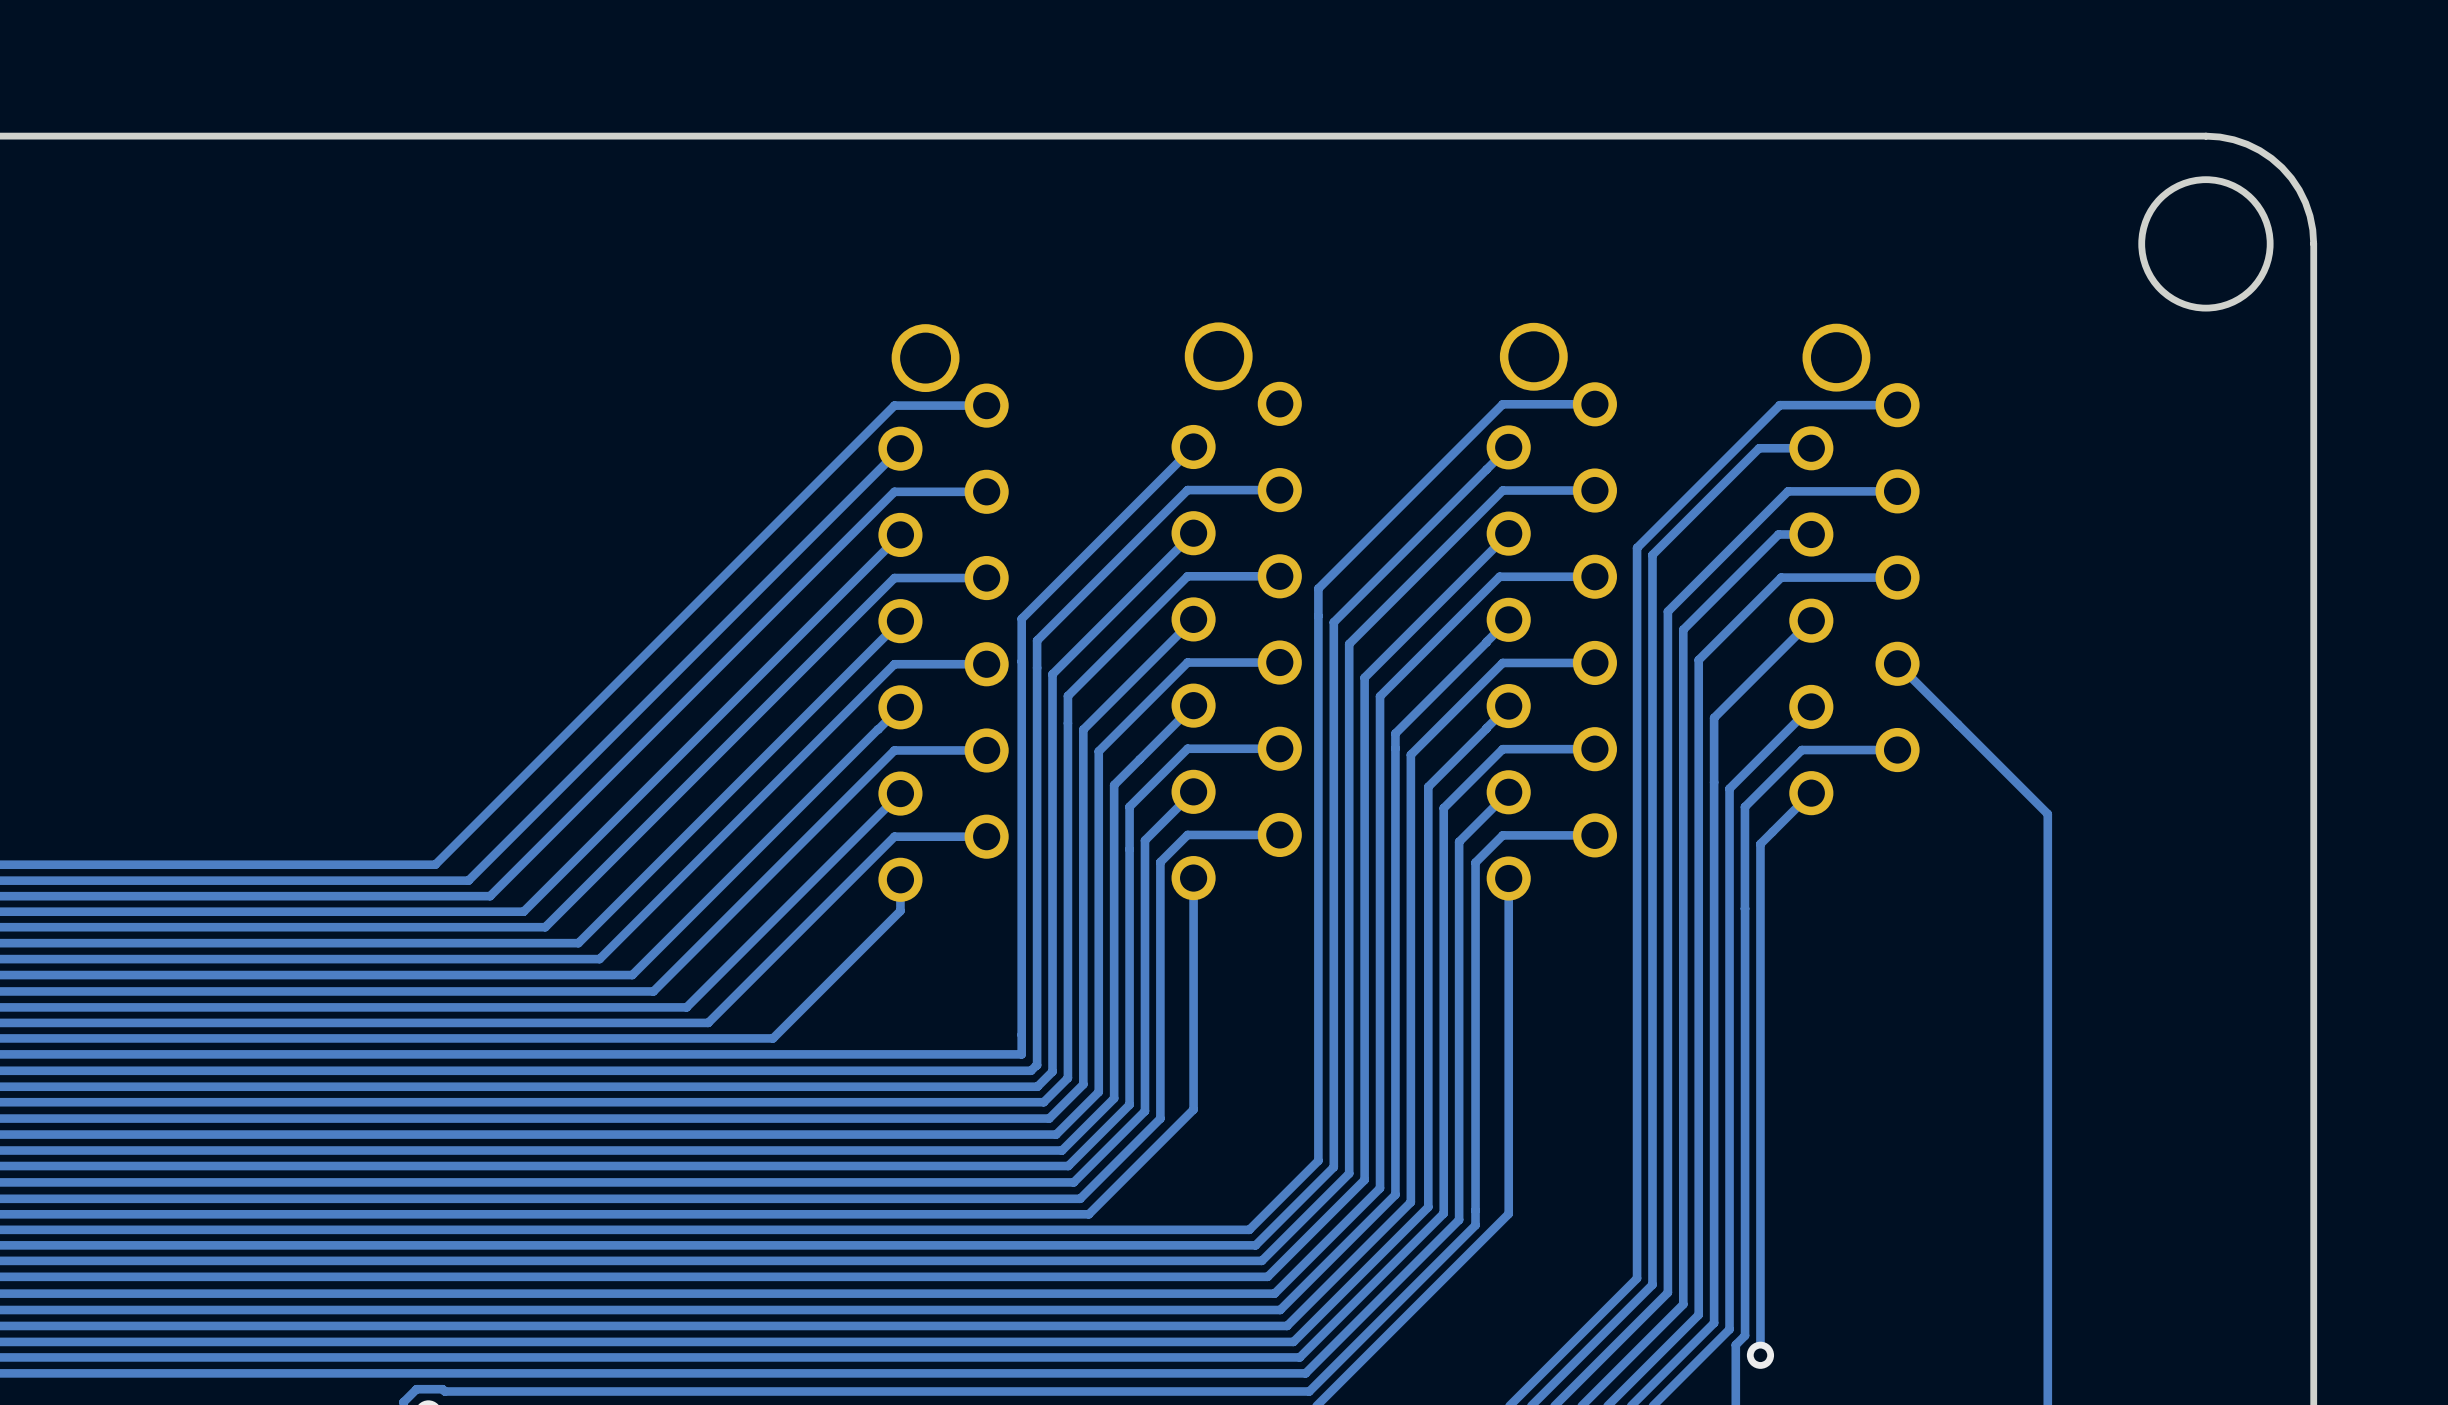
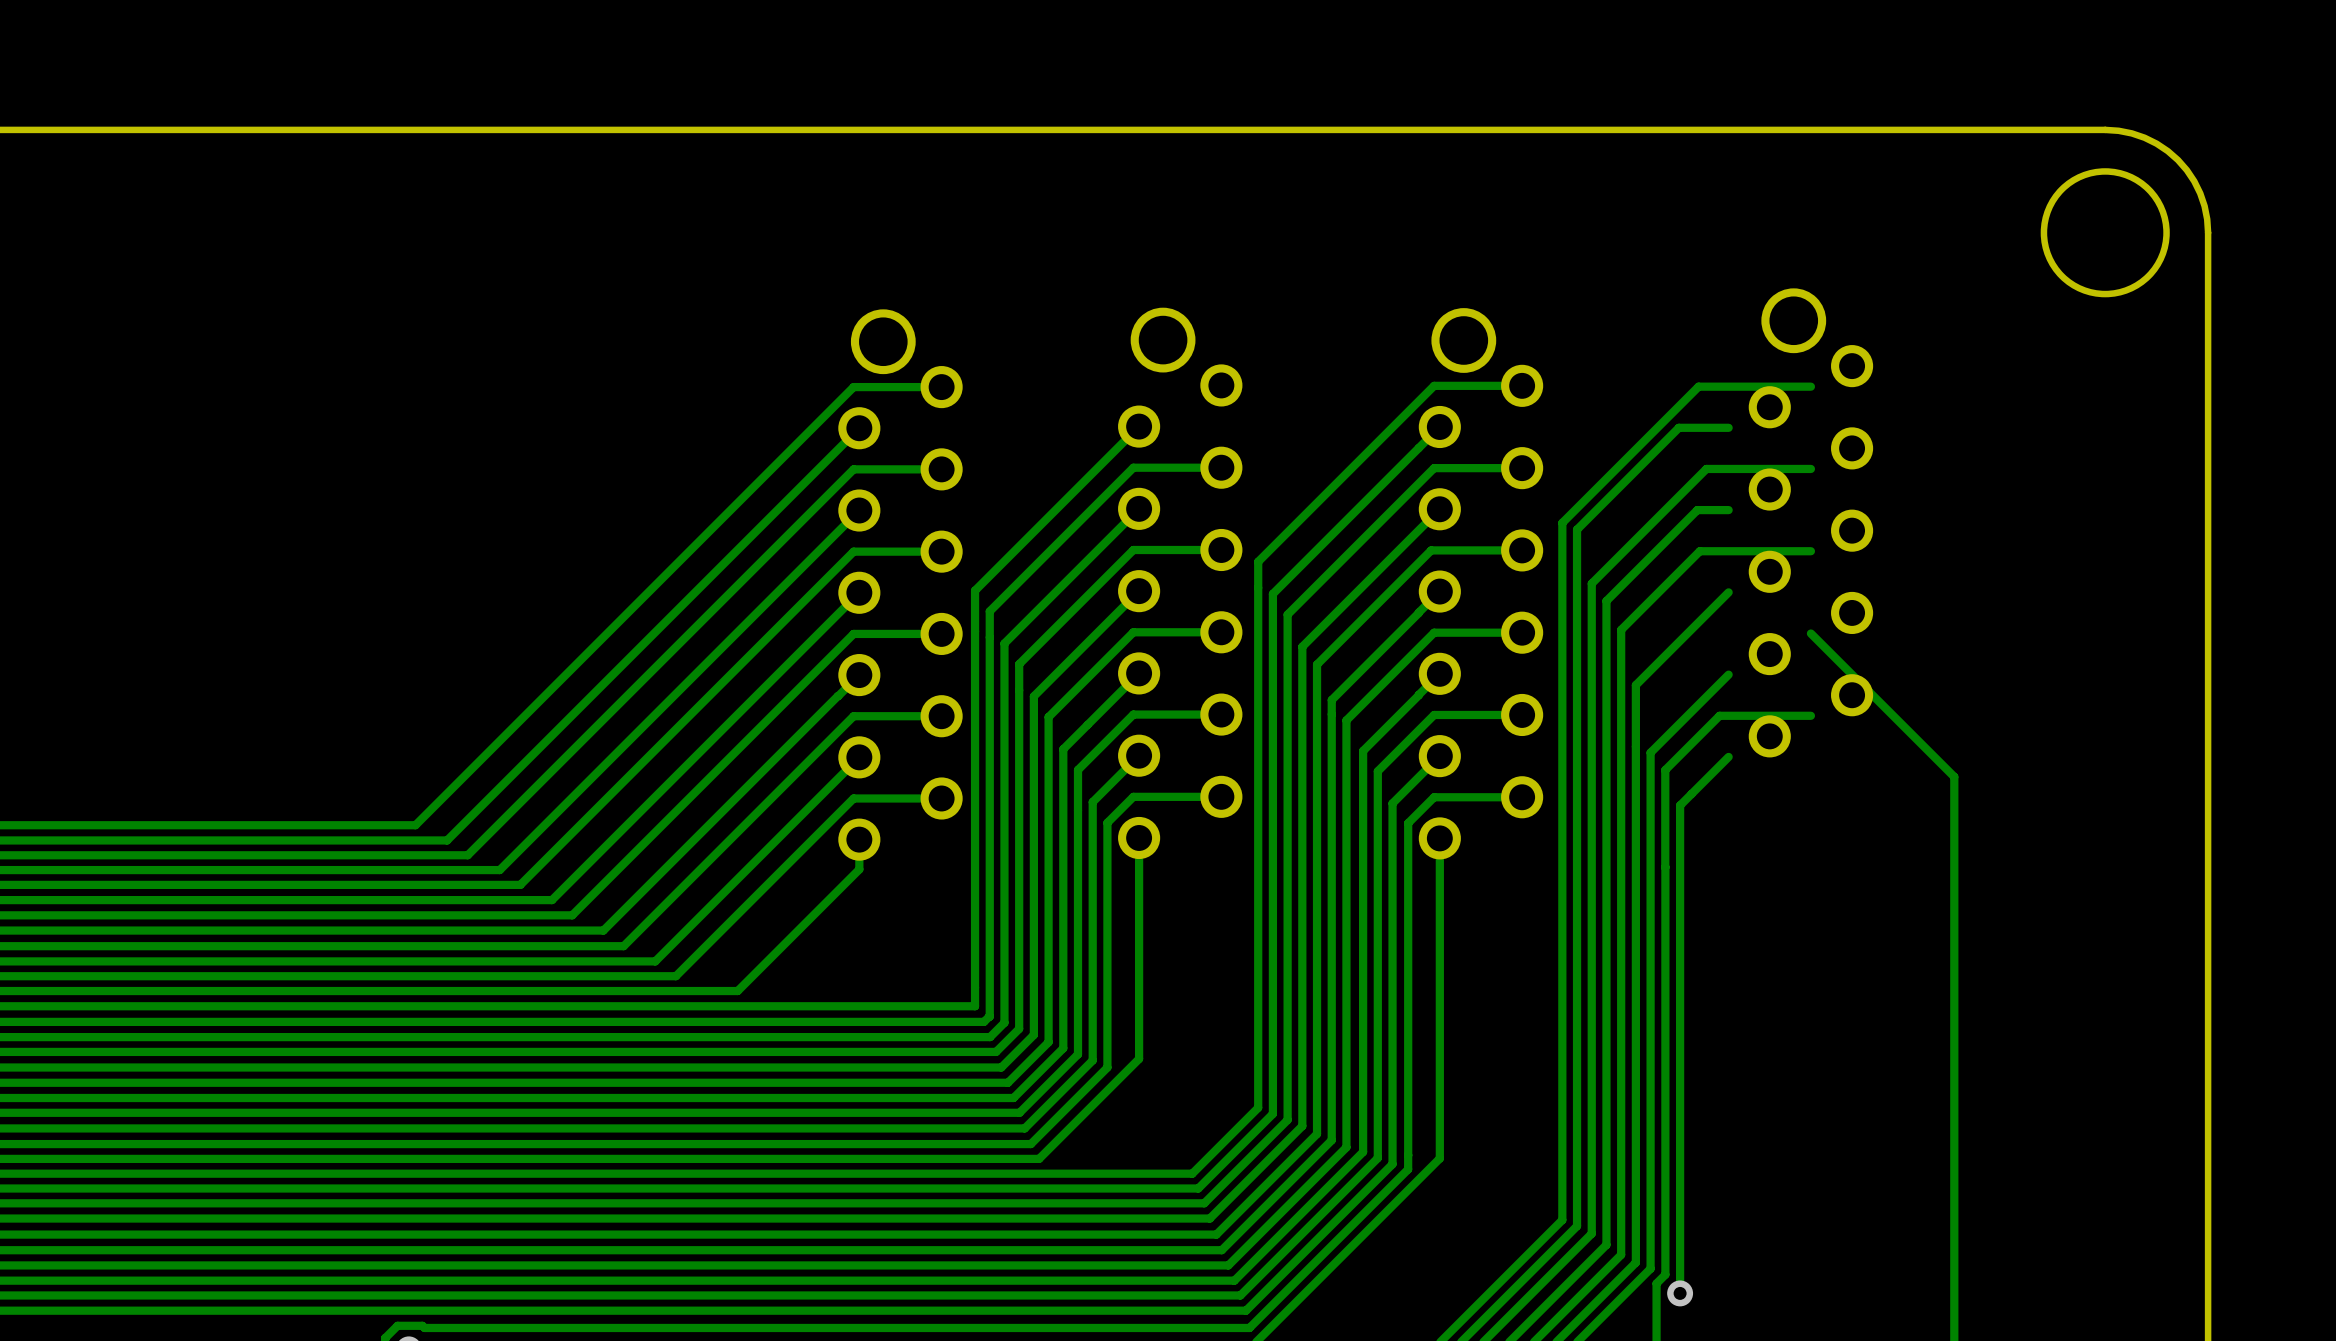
part position: (1854, 569) -> (1810, 522)

